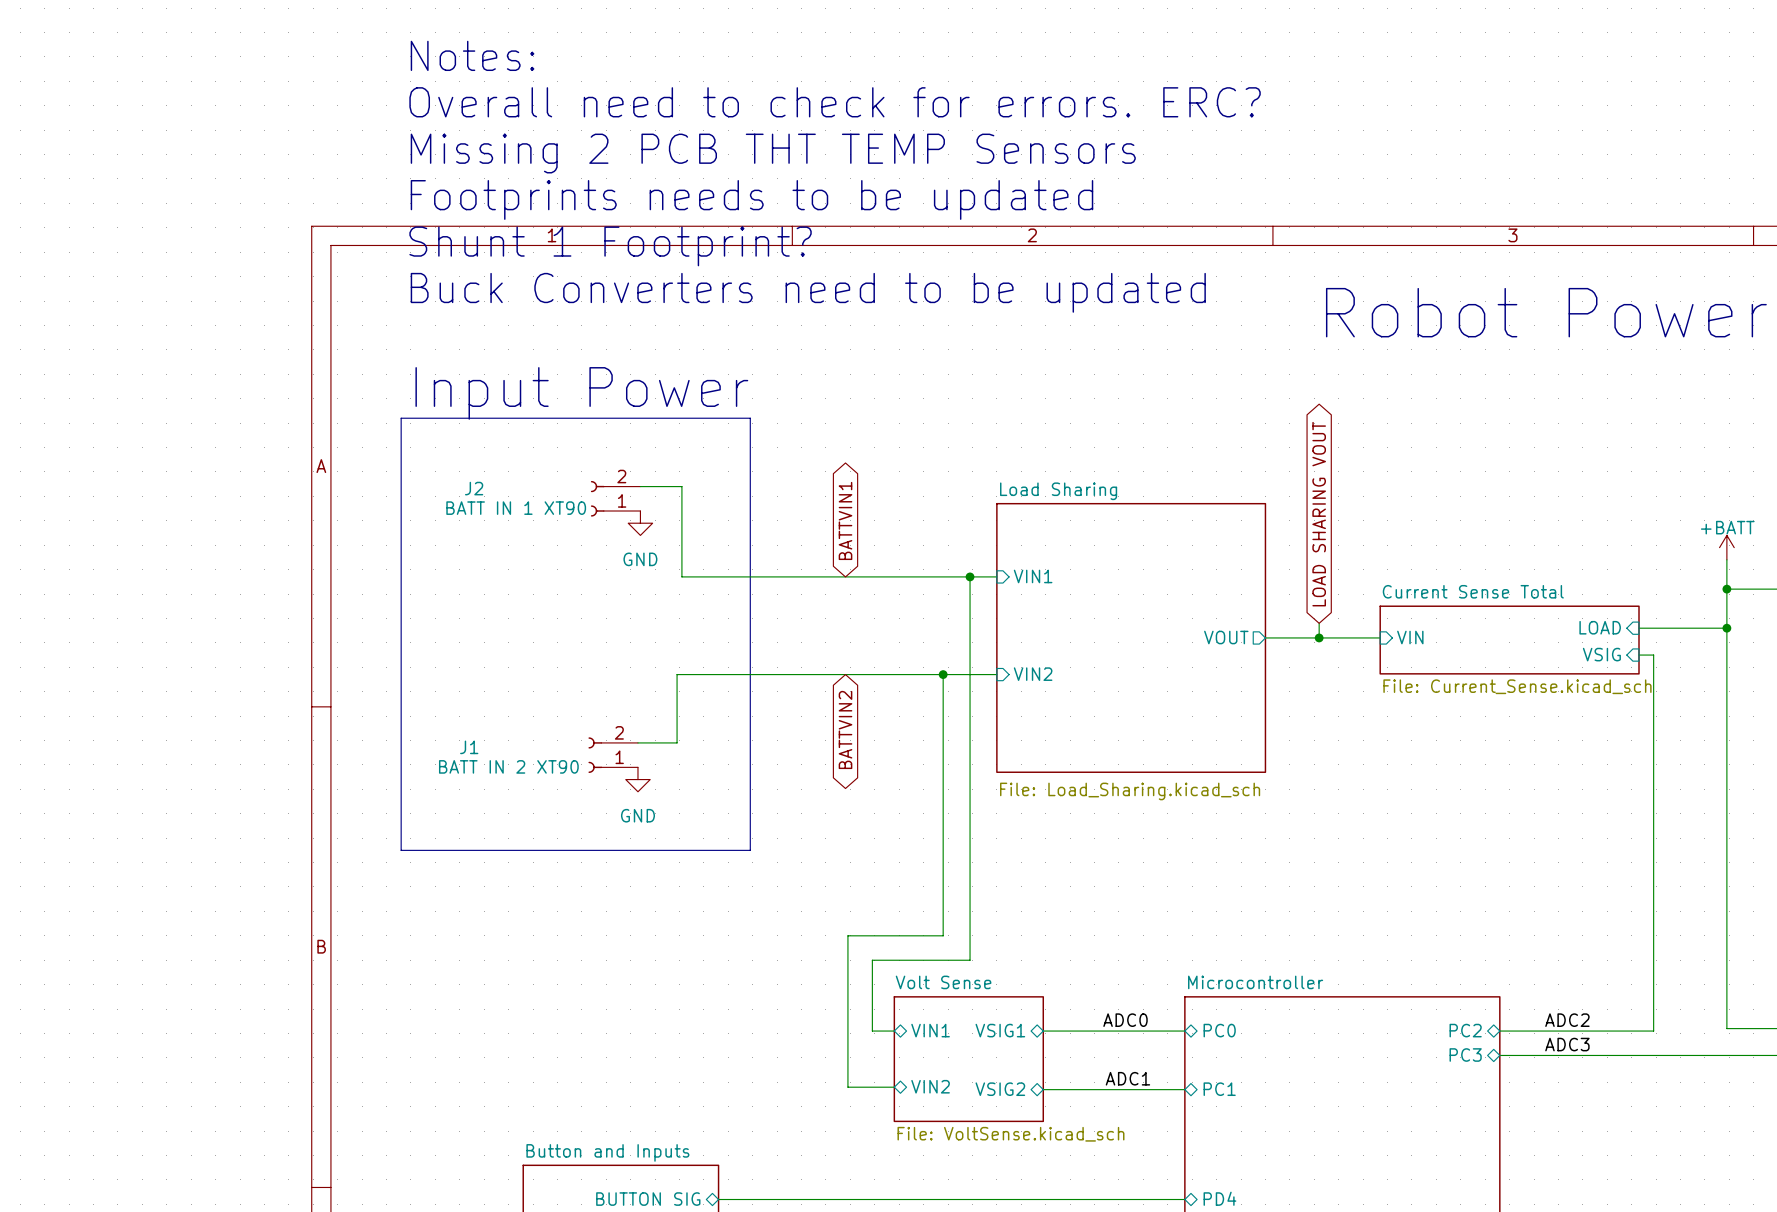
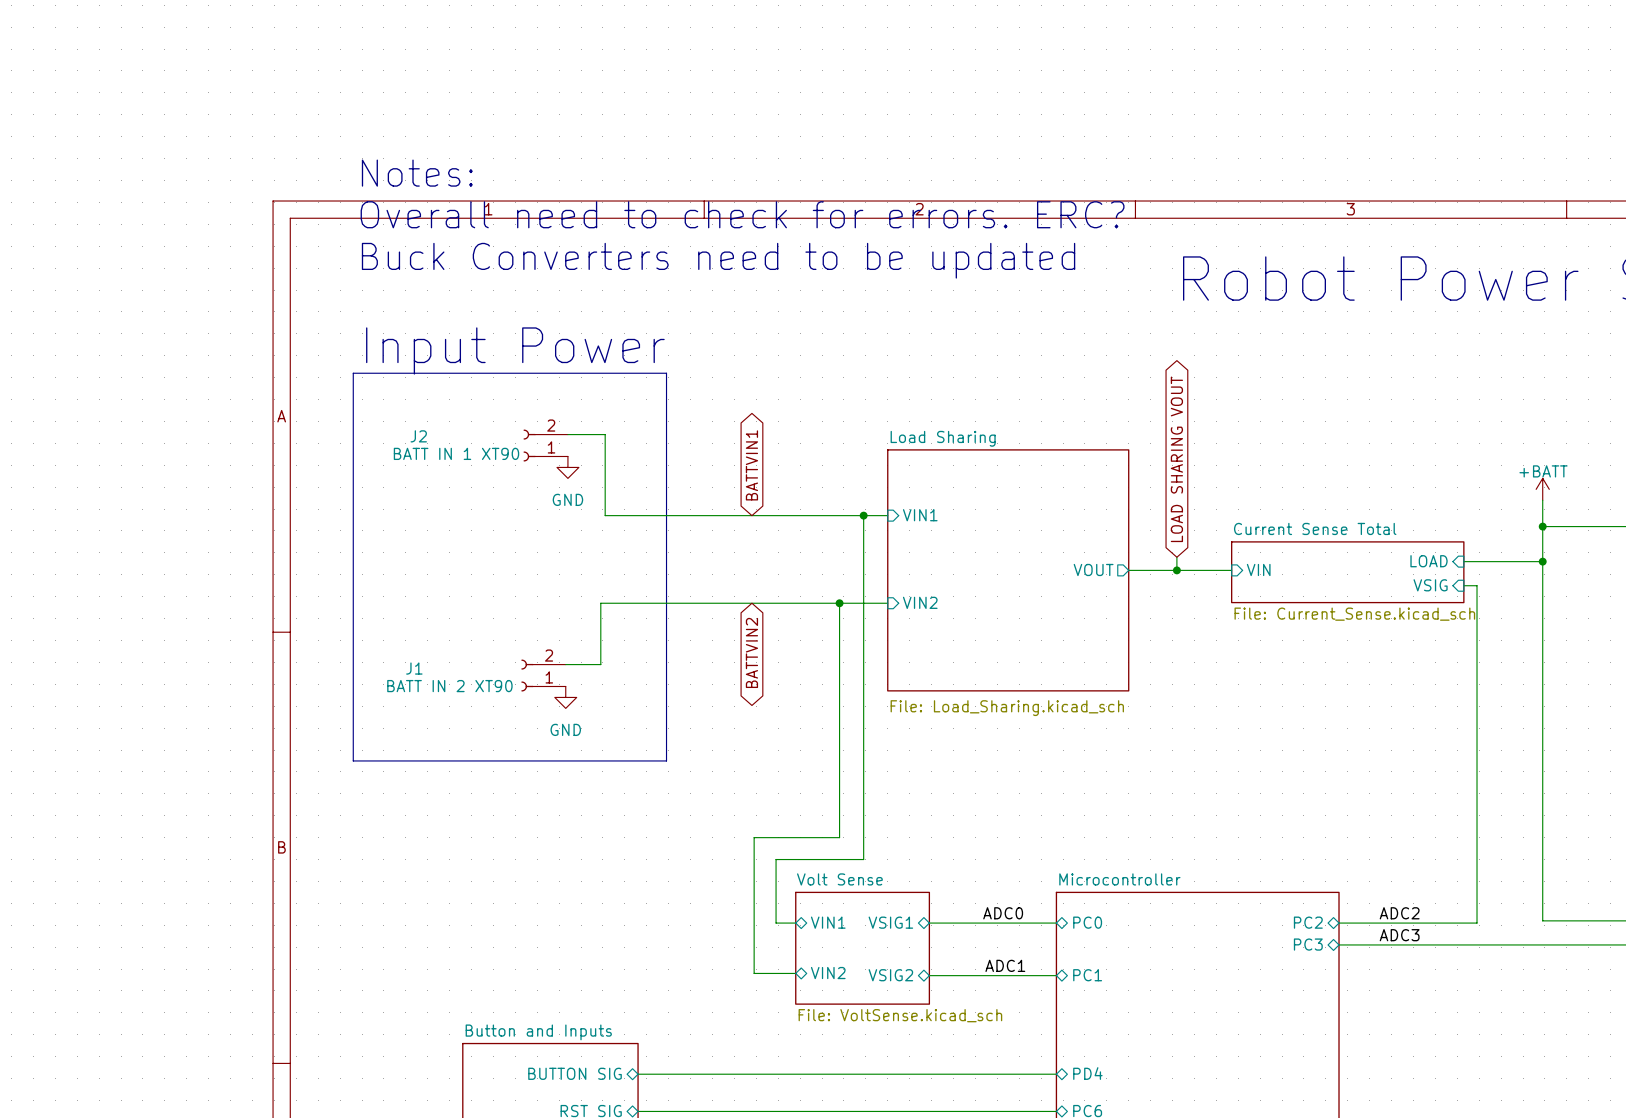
text: Notes: (472, 55) -> none
text: Overall need to check for errors. ERC? (835, 102) -> none
text: Missing 2 PCB THT TEMP Sensors (773, 153) -> none
text: Footprints needs to be updated (751, 199) -> Notes: (417, 173)
text: Shunt 1 Footprint? (610, 246) -> Overall need to check for errors. ERC? (742, 214)

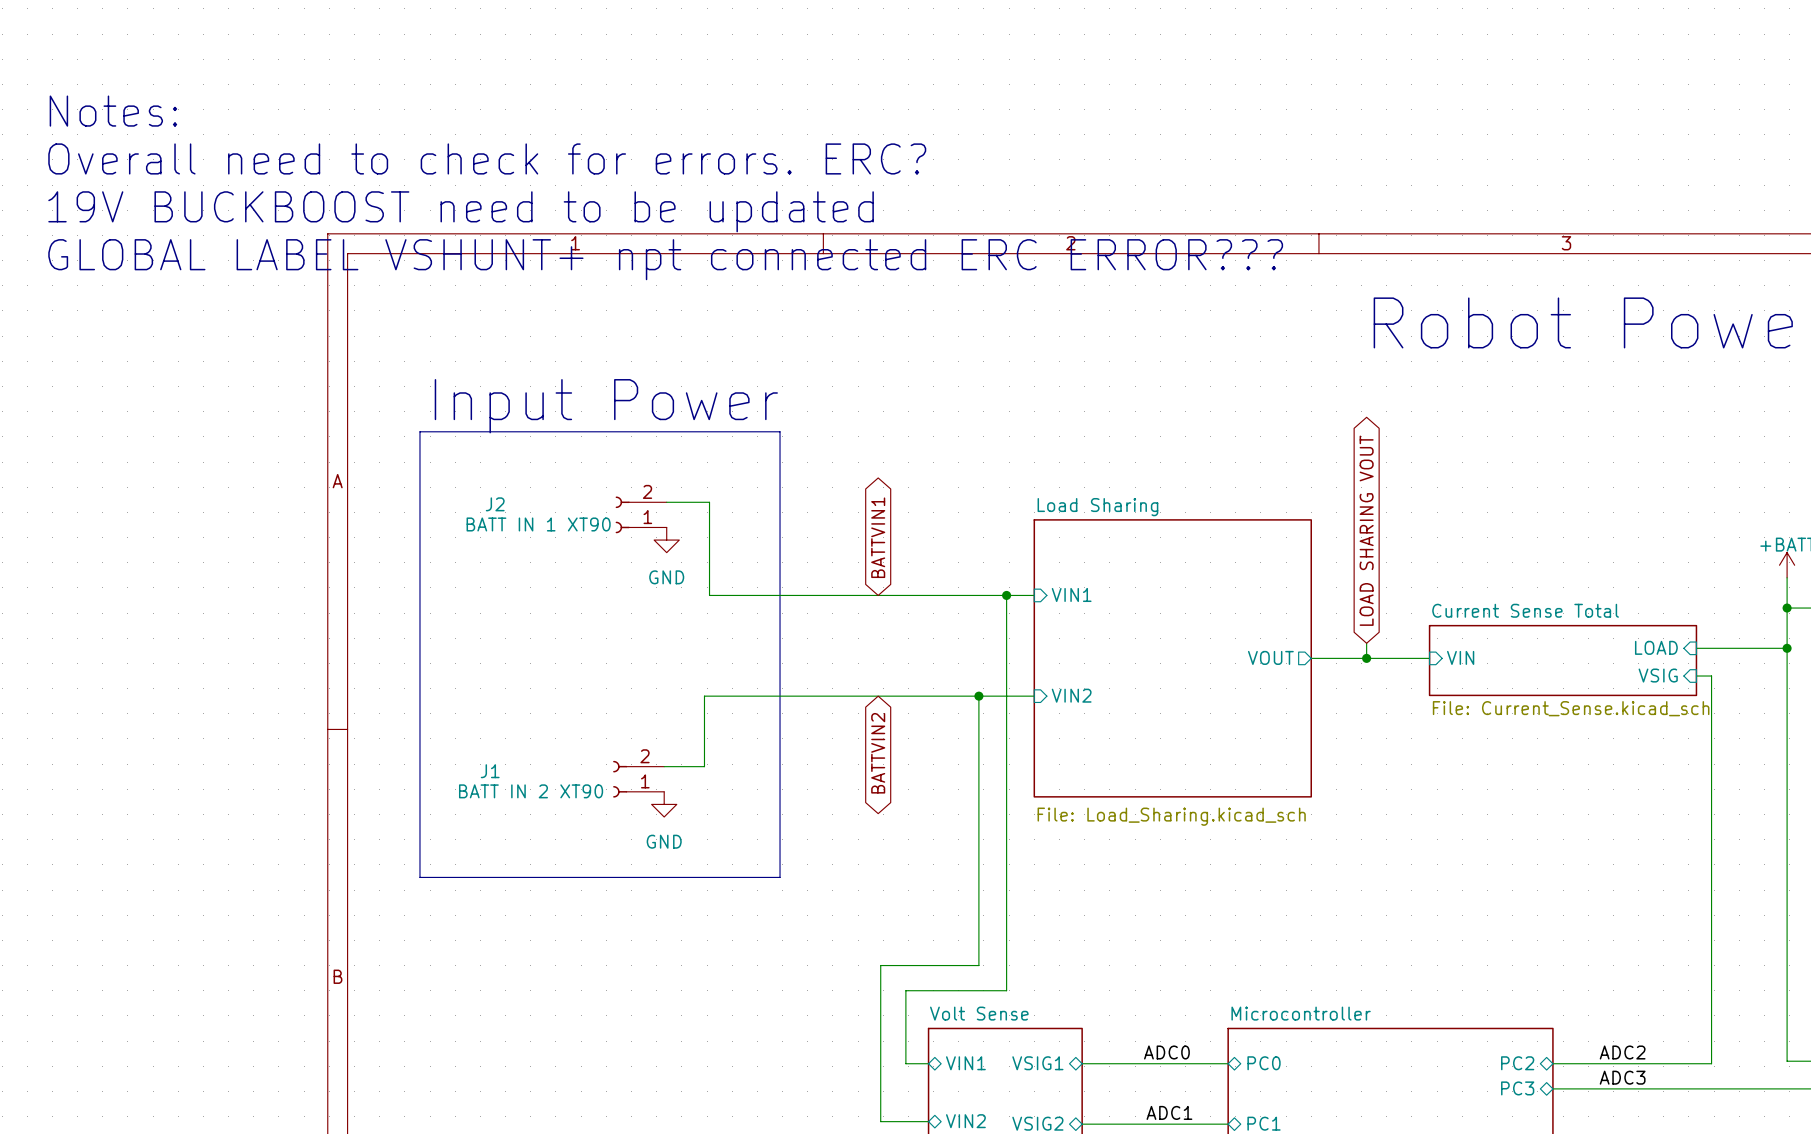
text: none -> Notes: (113, 111)
text: none -> Overall need to check for errors. ERC? (487, 158)
text: Notes: (417, 173) -> none
text: none -> 19V BUCKBOOST need to be updated (461, 211)
text: Overall need to check for errors. ERC? (742, 214) -> none
text: none -> GLOBAL LABEL VSHUNT+ npt connected ERC ERROR??? (665, 259)
text: Buck Converters need to be updated (718, 260) -> none

